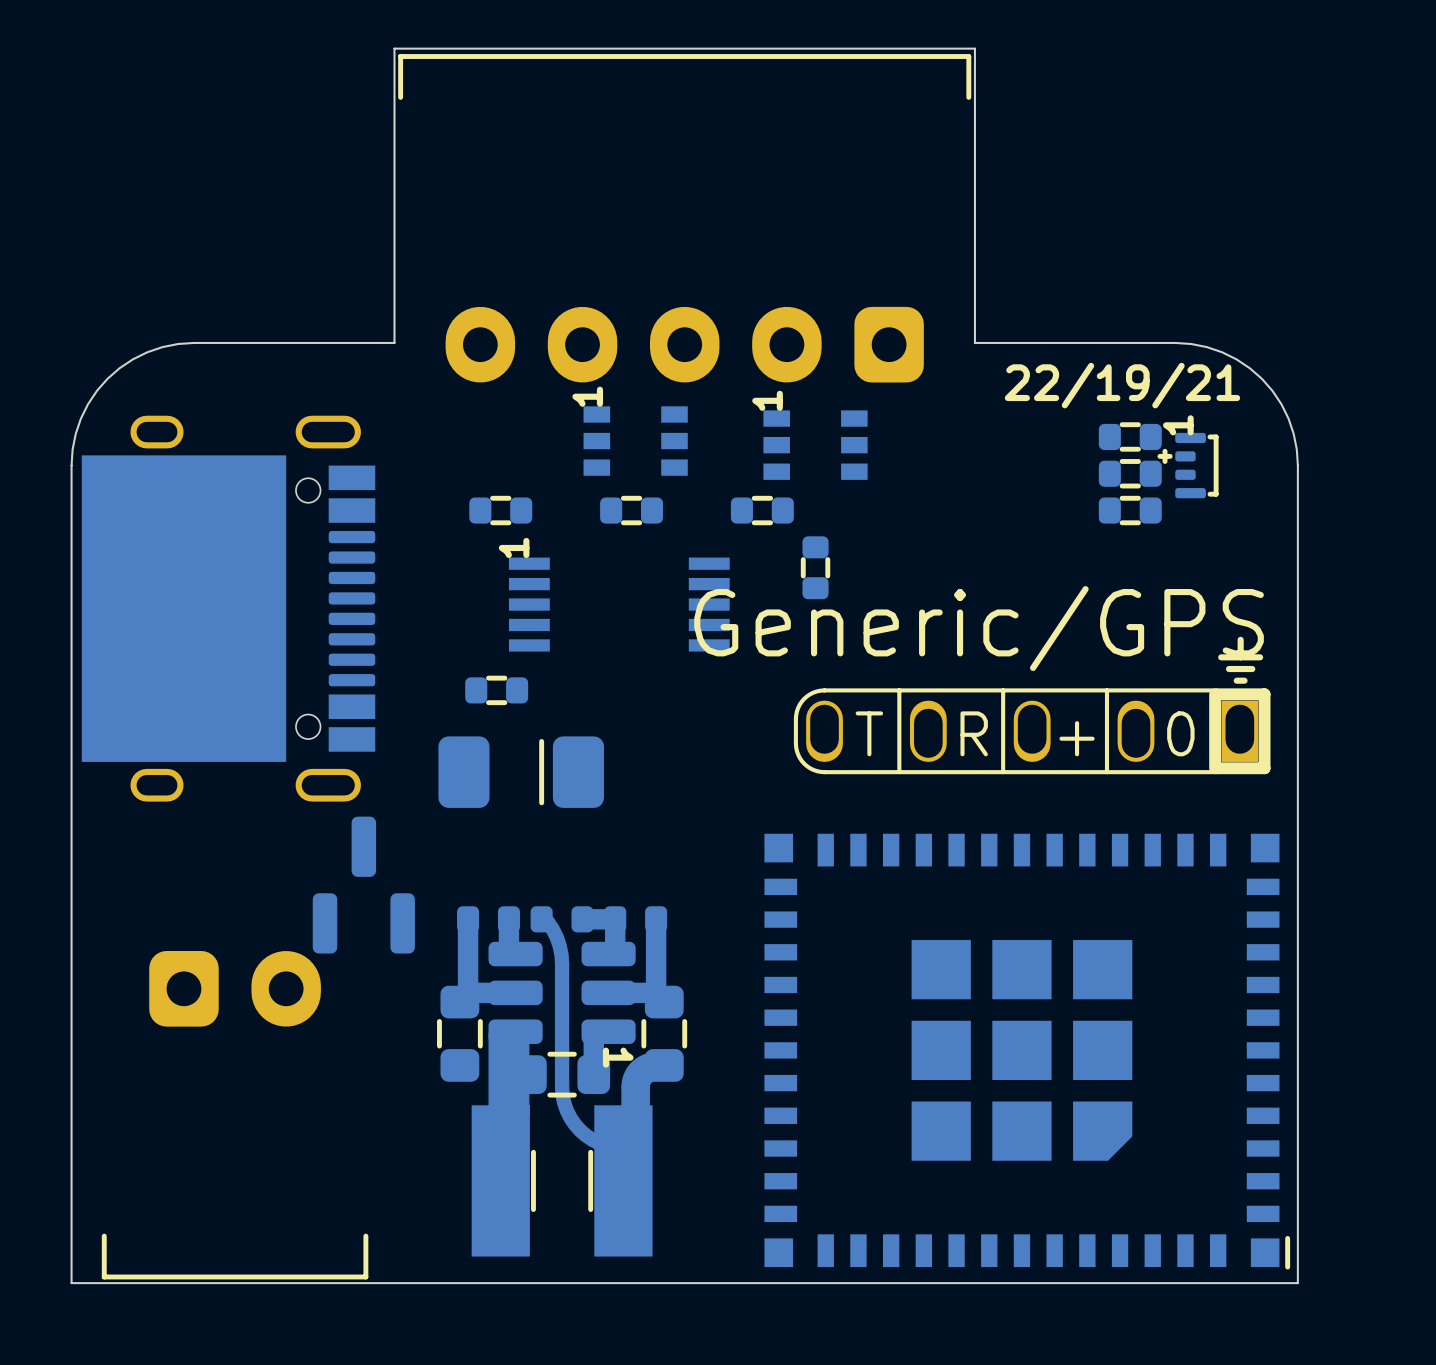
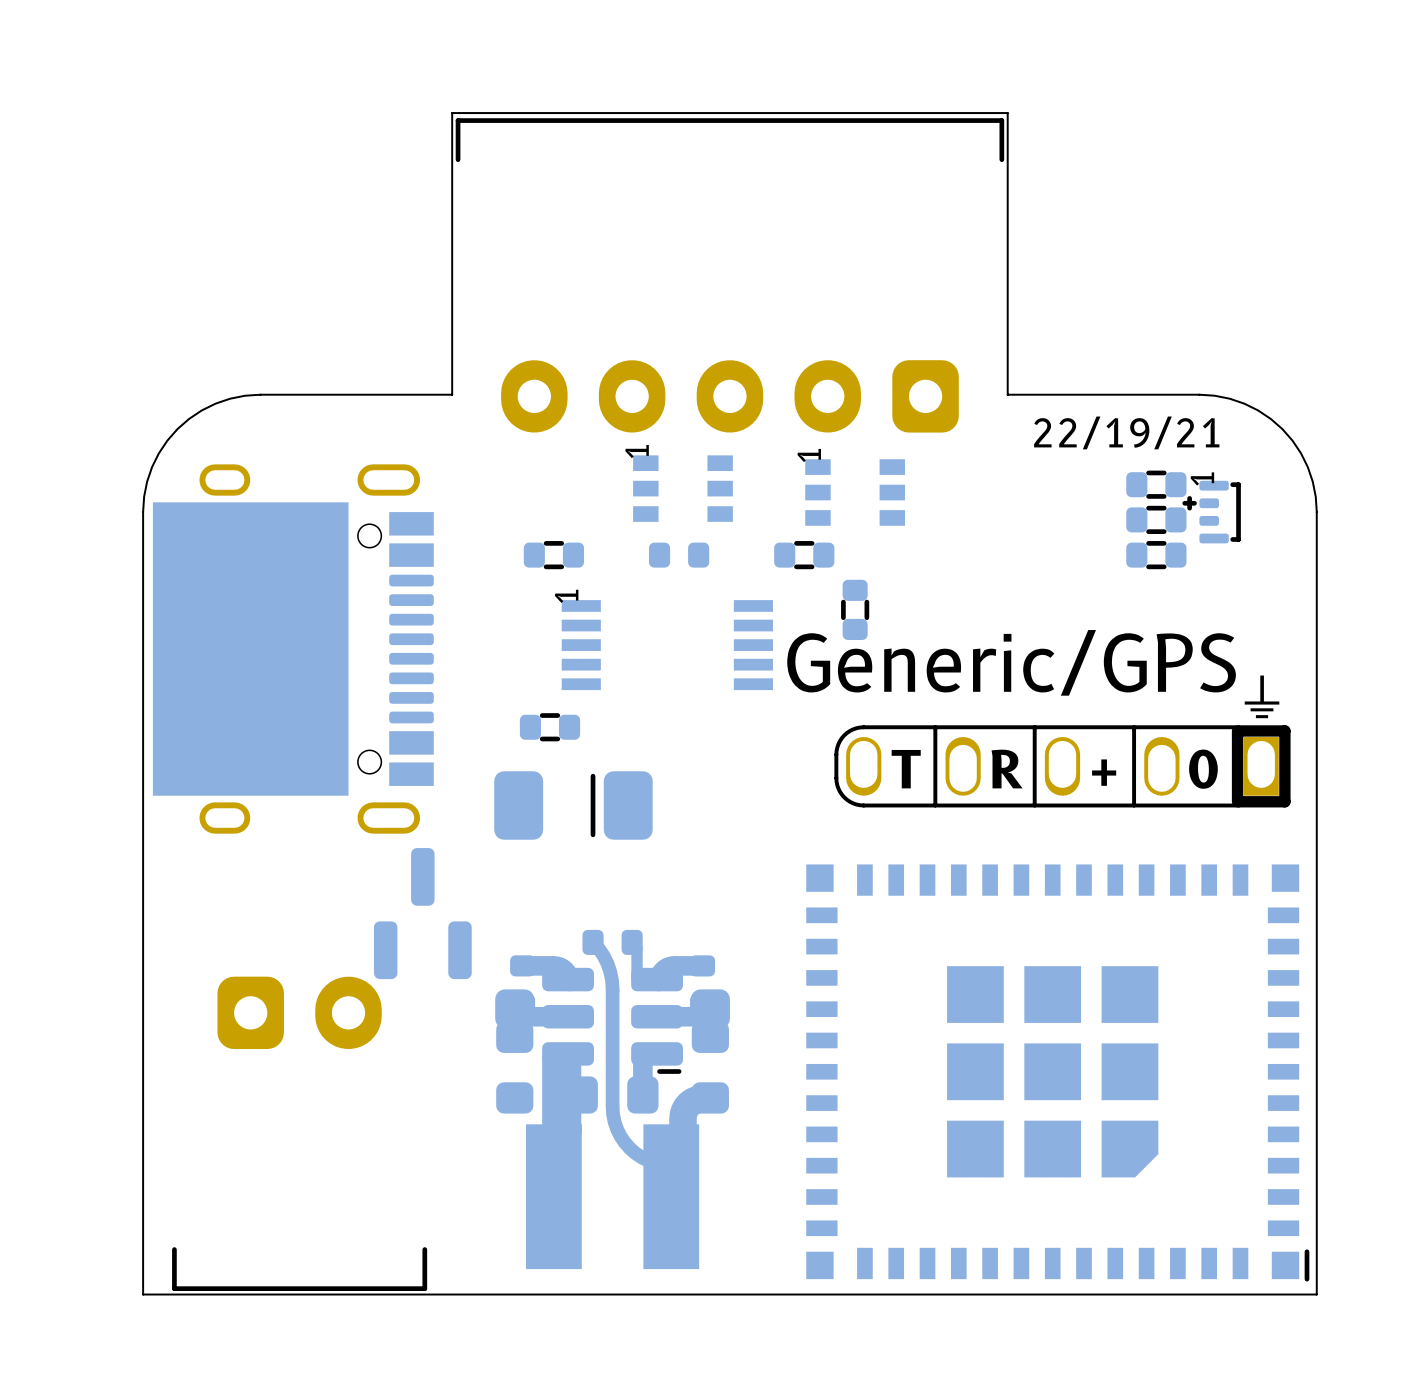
part footprint: [600, 495, 664, 526] -> [648, 542, 710, 568]
part footprint: [440, 906, 684, 1257] -> [495, 929, 730, 1270]
drawing: [437, 1019, 483, 1049] -> none
drawing: [641, 1019, 688, 1049] -> none
drawing: [547, 1051, 577, 1098] -> none
drawing: [531, 1149, 594, 1212] -> none

